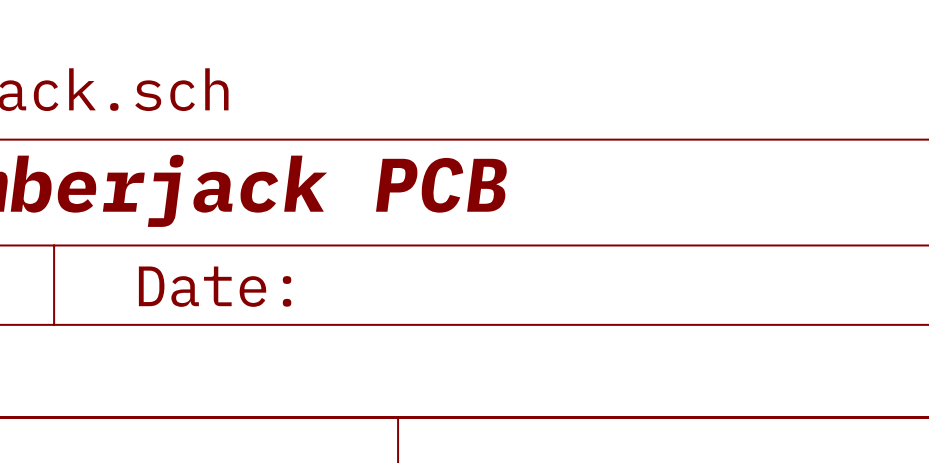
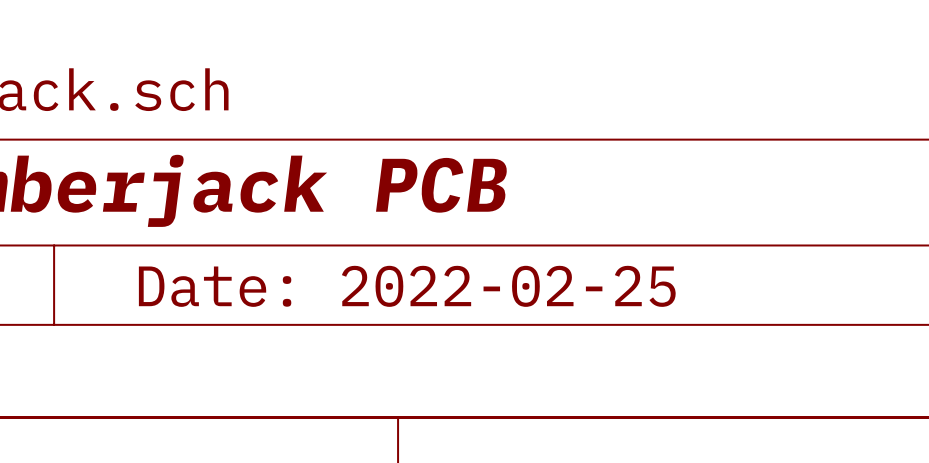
title block: Date: (215, 286) -> Date: 2022-02-25 (407, 286)

